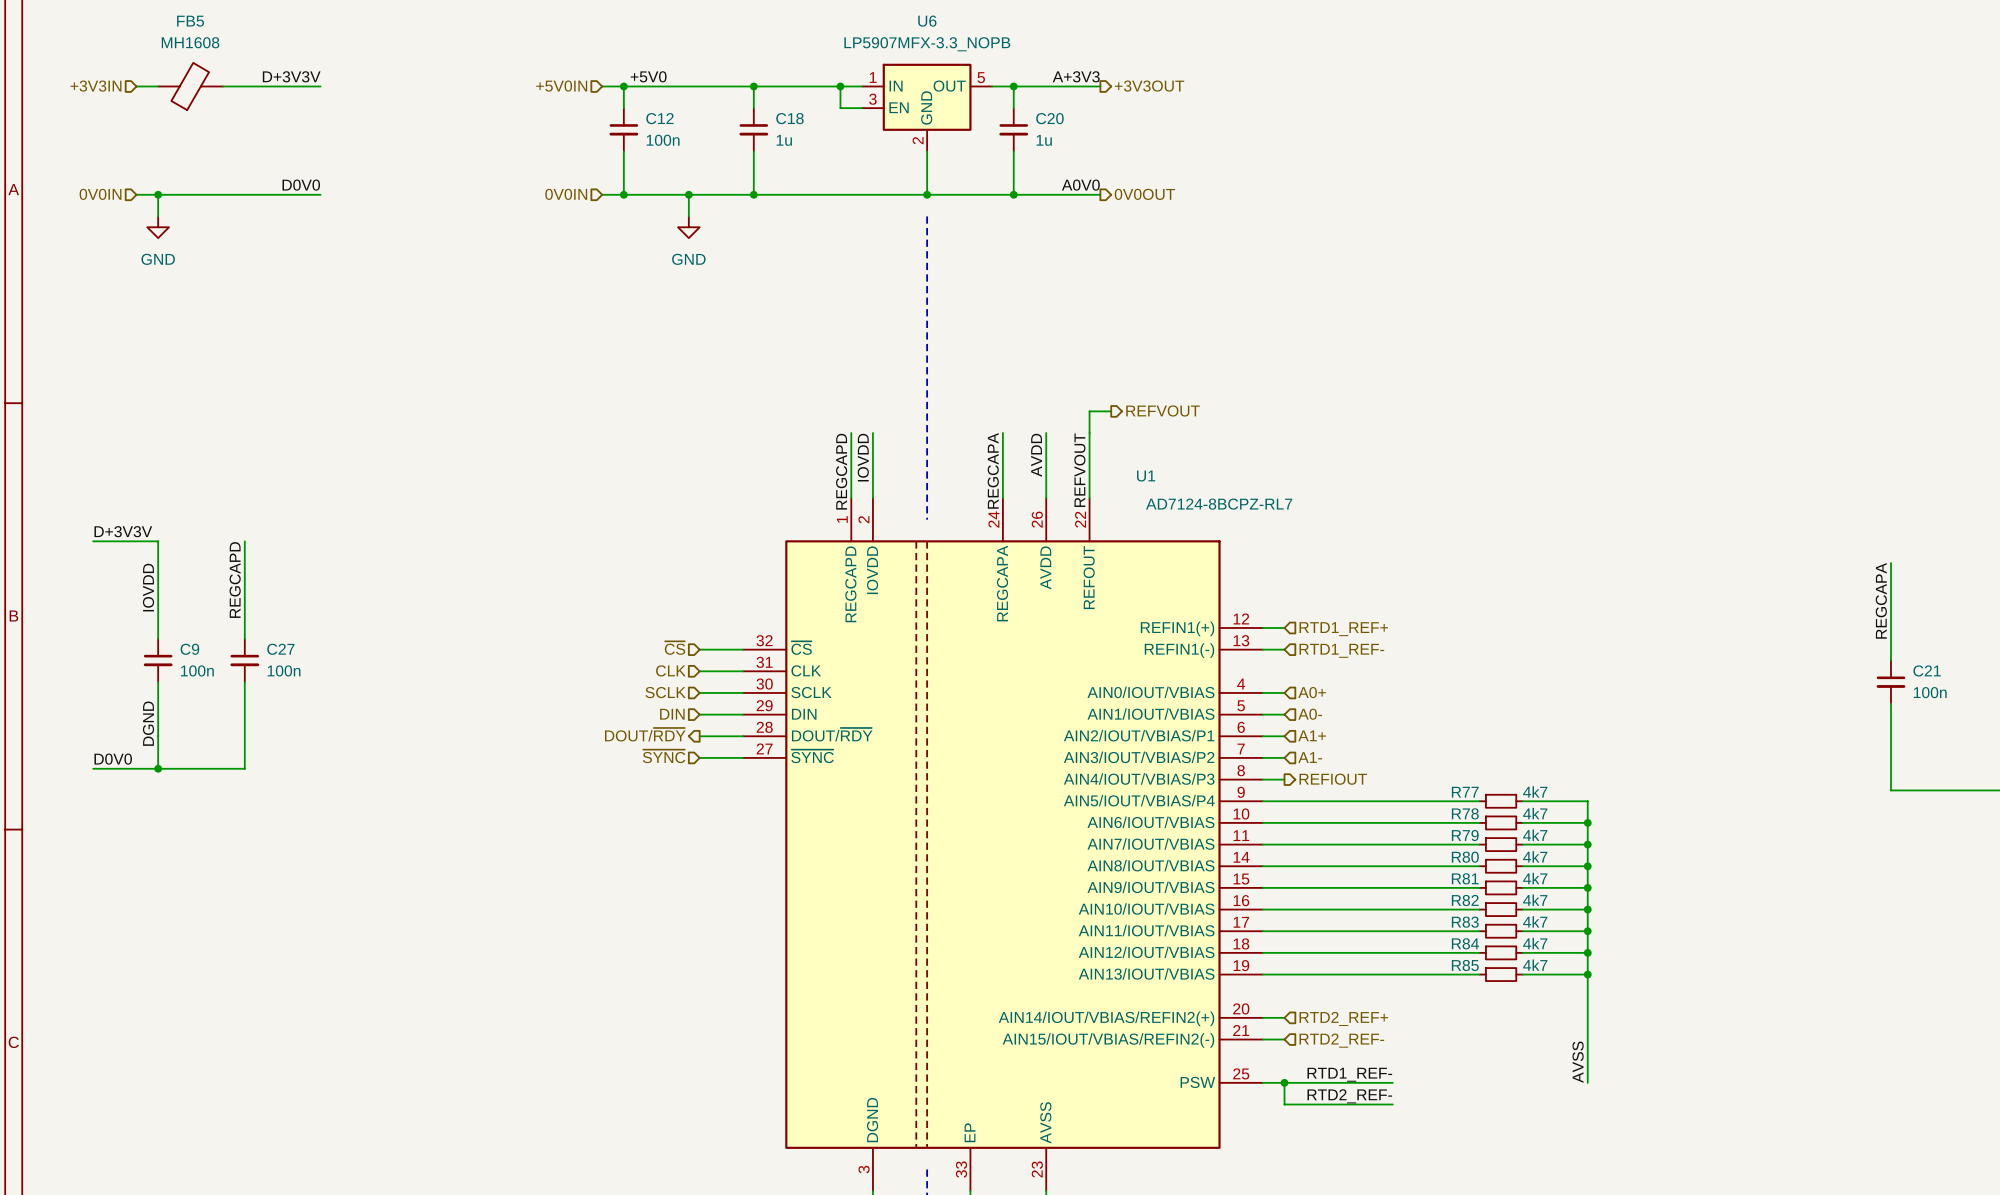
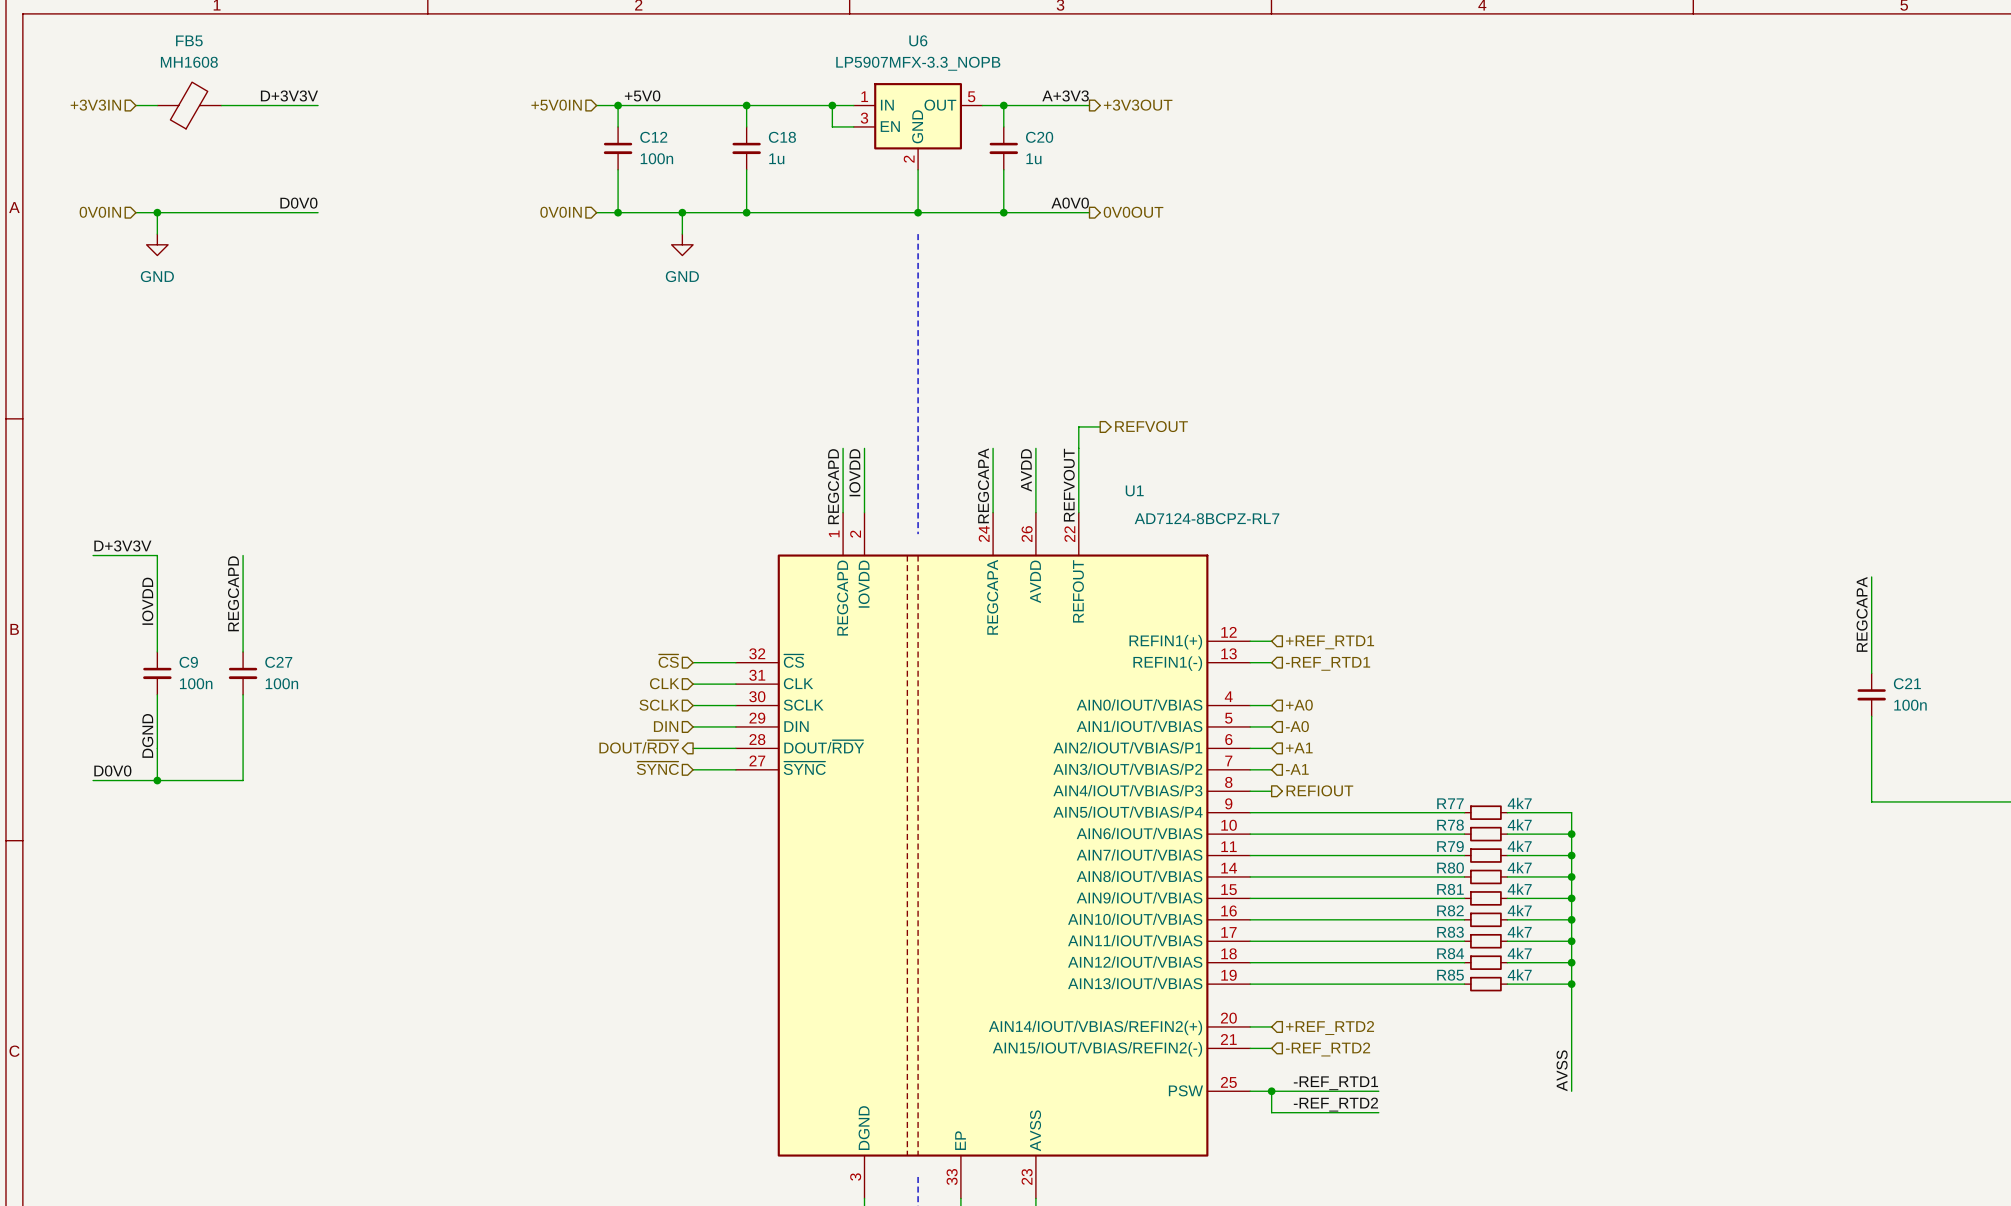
hierarchical label: RTD1_REF+ (1343, 629) -> +REF_RTD1 (1330, 642)
hierarchical label: RTD1_REF- (1341, 650) -> -REF_RTD1 (1328, 663)
hierarchical label: A0+ (1312, 692) -> +A0 (1299, 705)
hierarchical label: A0- (1310, 714) -> -A0 (1297, 726)
hierarchical label: A1+ (1312, 735) -> +A1 (1299, 748)
hierarchical label: A1- (1310, 757) -> -A1 (1297, 769)
hierarchical label: RTD2_REF+ (1343, 1018) -> +REF_RTD2 (1330, 1028)
hierarchical label: RTD2_REF- (1341, 1040) -> -REF_RTD2 (1328, 1049)
label: RTD1_REF- (1349, 1074) -> -REF_RTD1 (1335, 1083)
label: RTD2_REF- (1349, 1096) -> -REF_RTD2 (1335, 1104)

